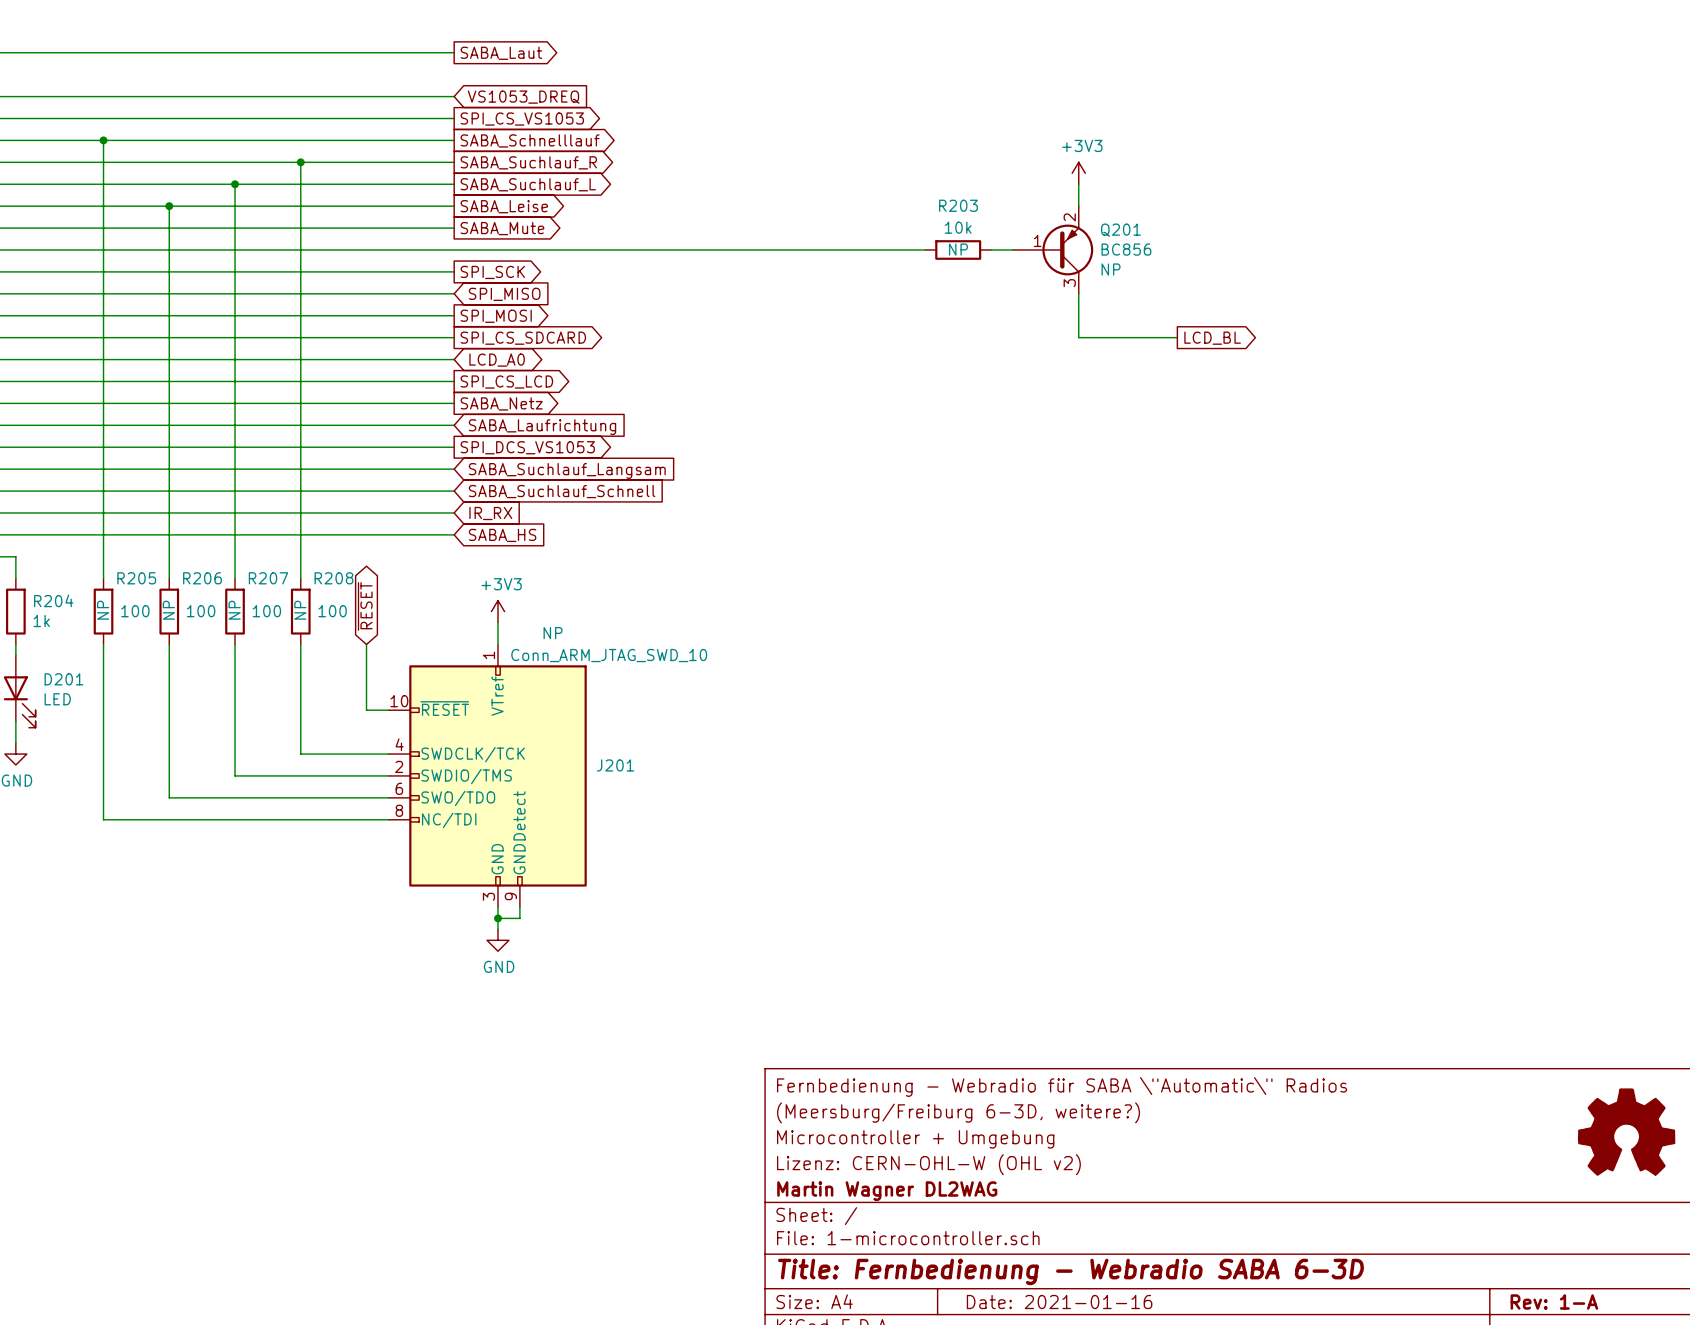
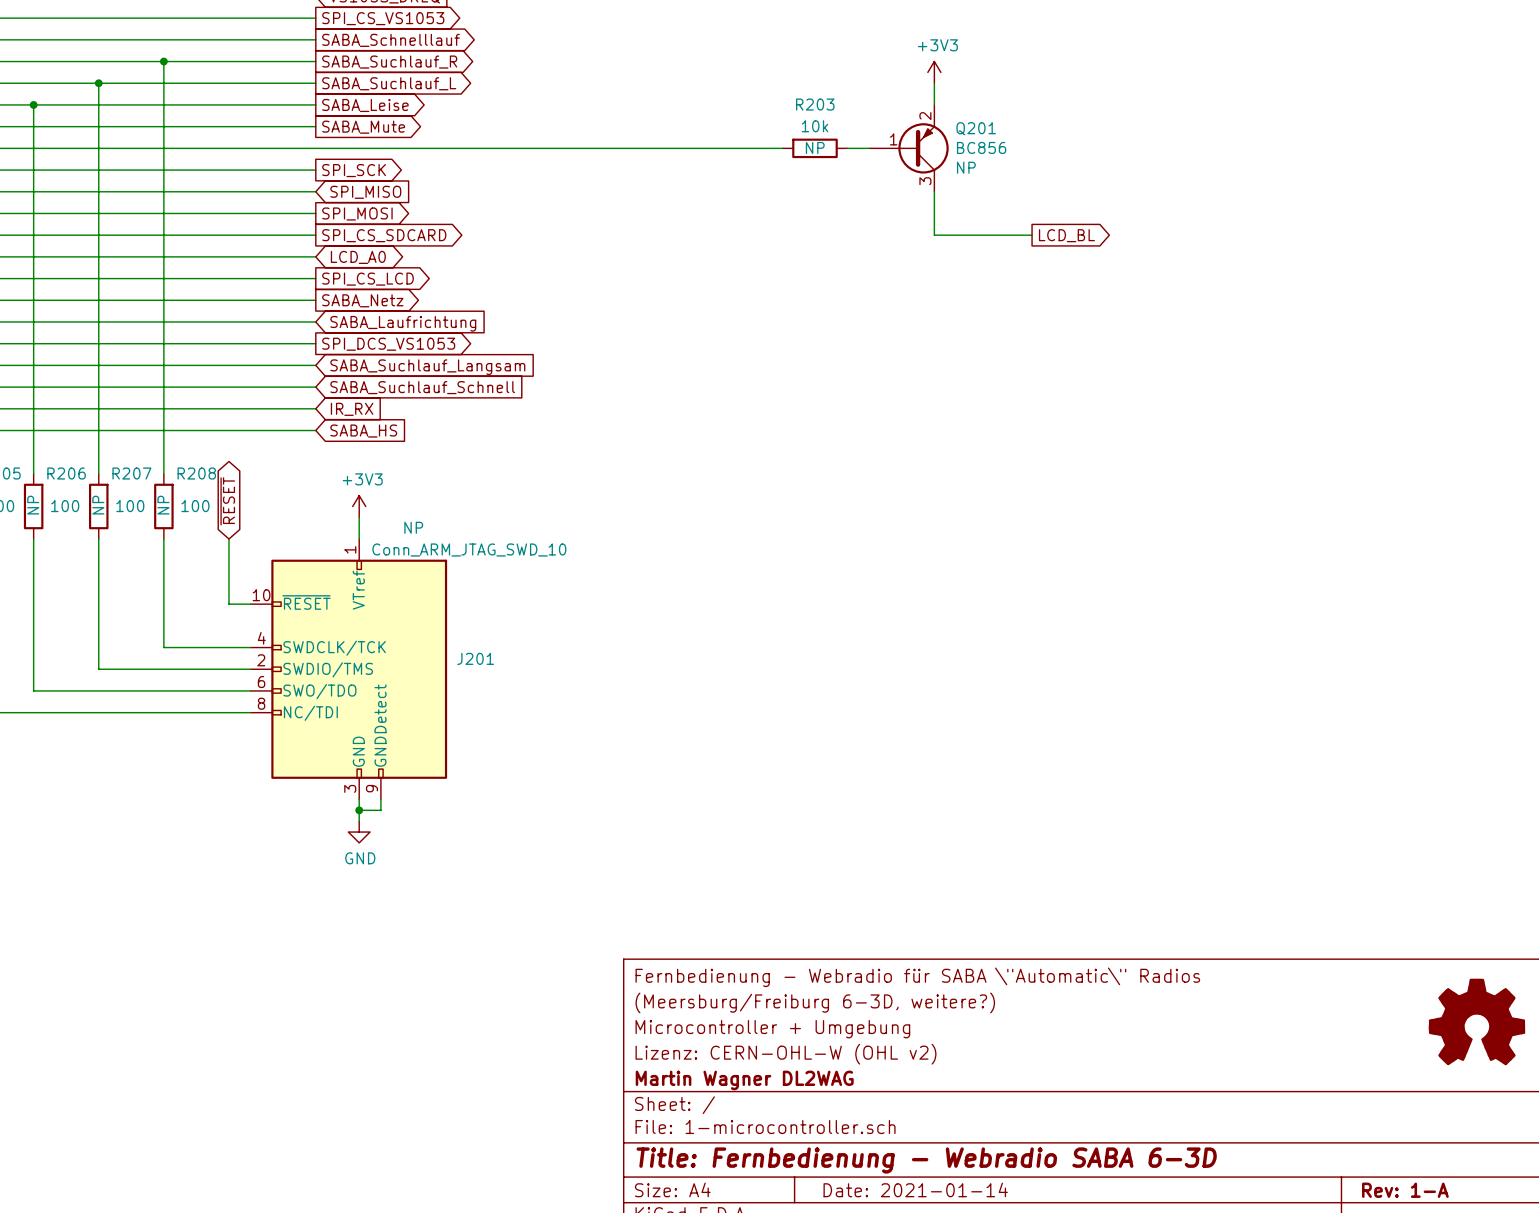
title block: Date: 2021-01-16 (1059, 1302) -> Date: 2021-01-14 (915, 1189)

